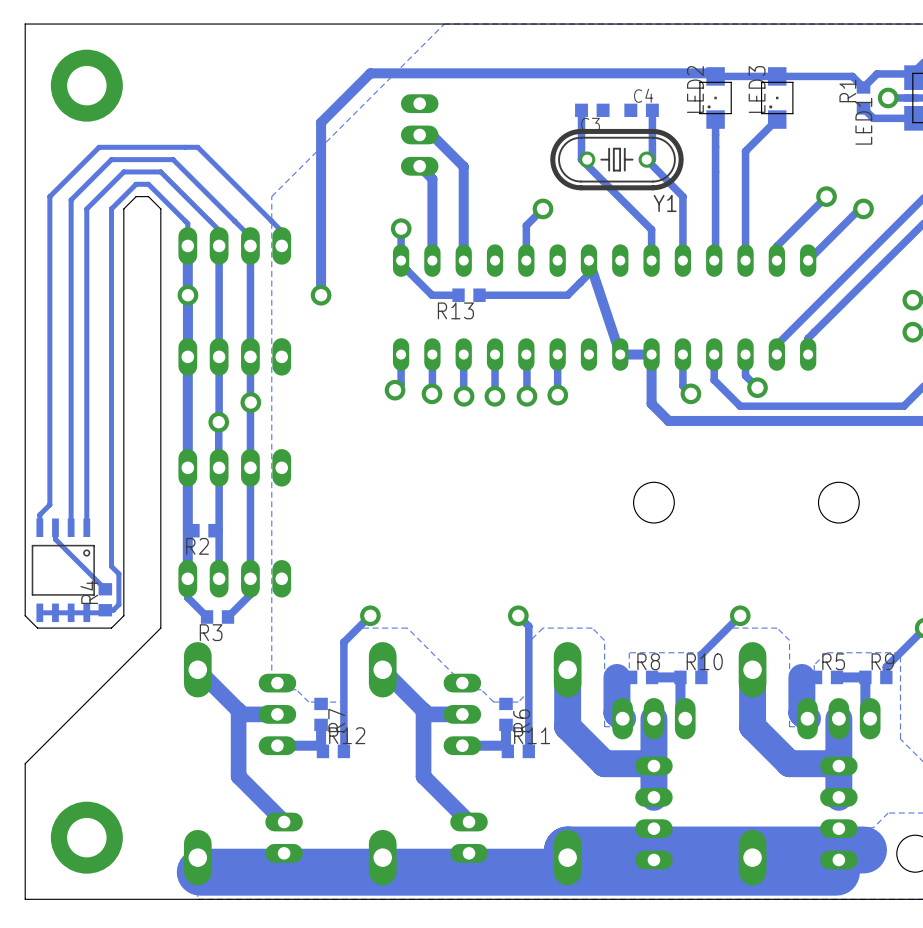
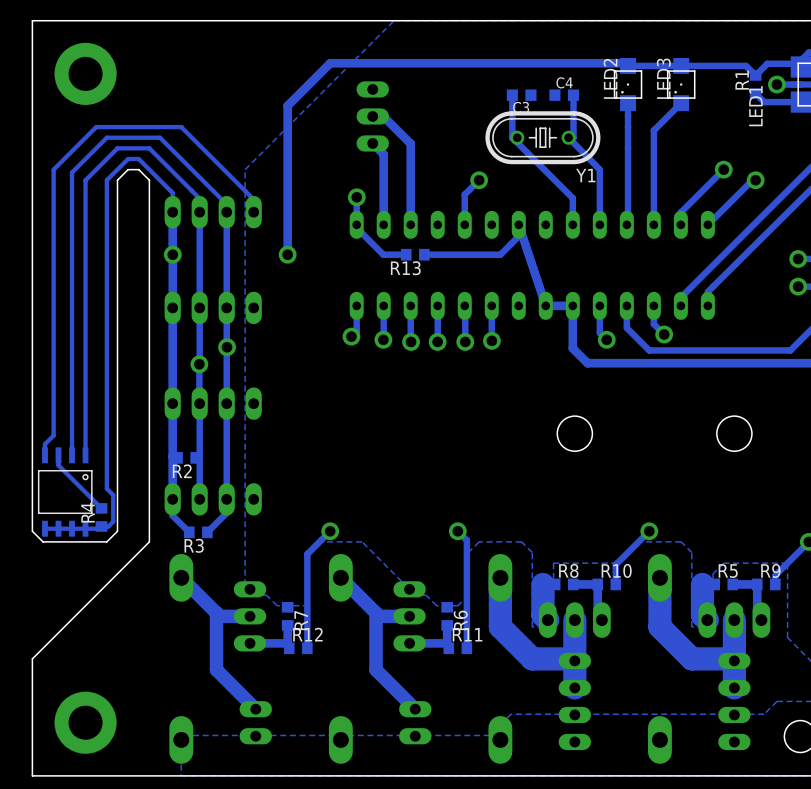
track: (863, 850) (567, 850) (567, 862) -> none
track: (836, 872) (200, 872) -> none

